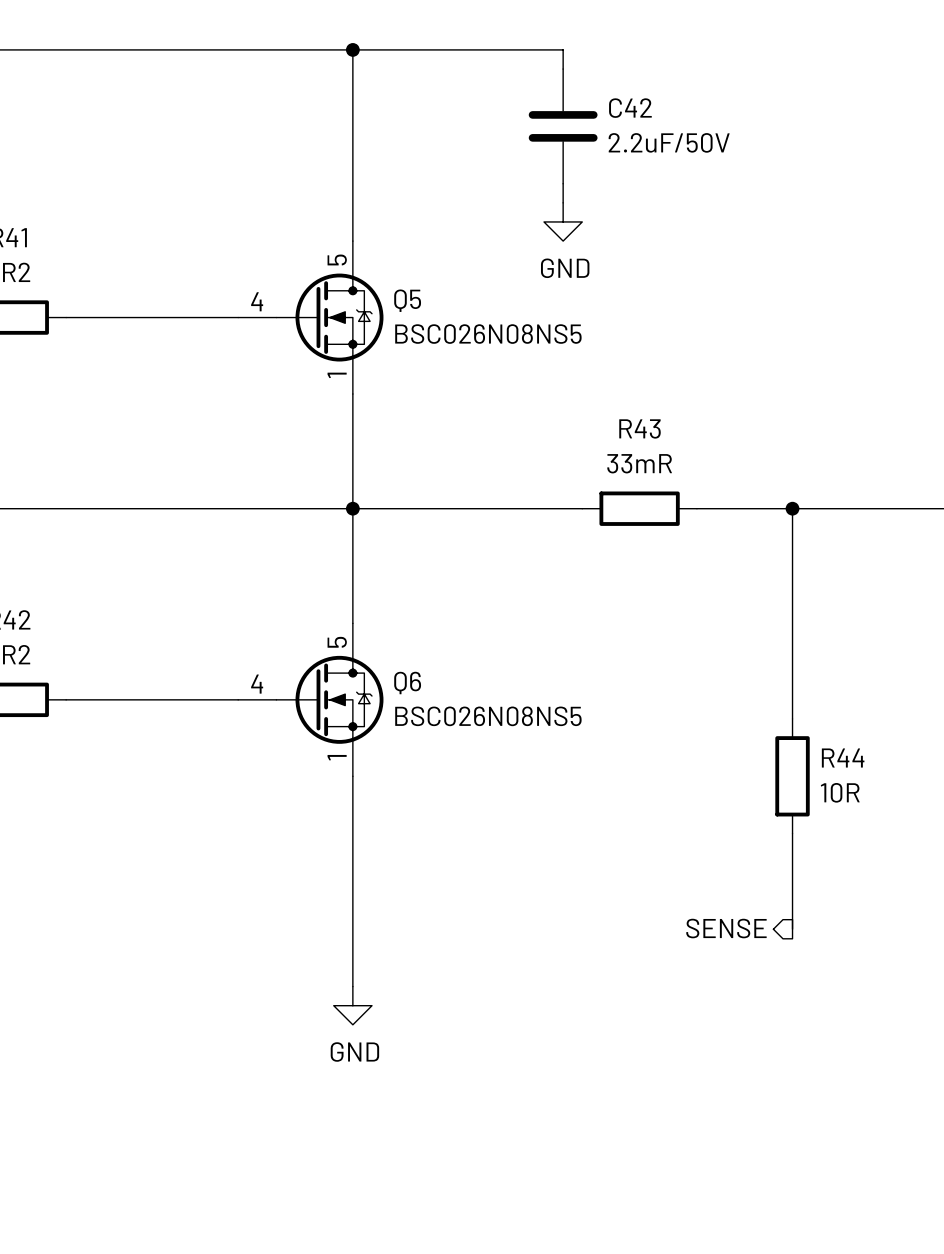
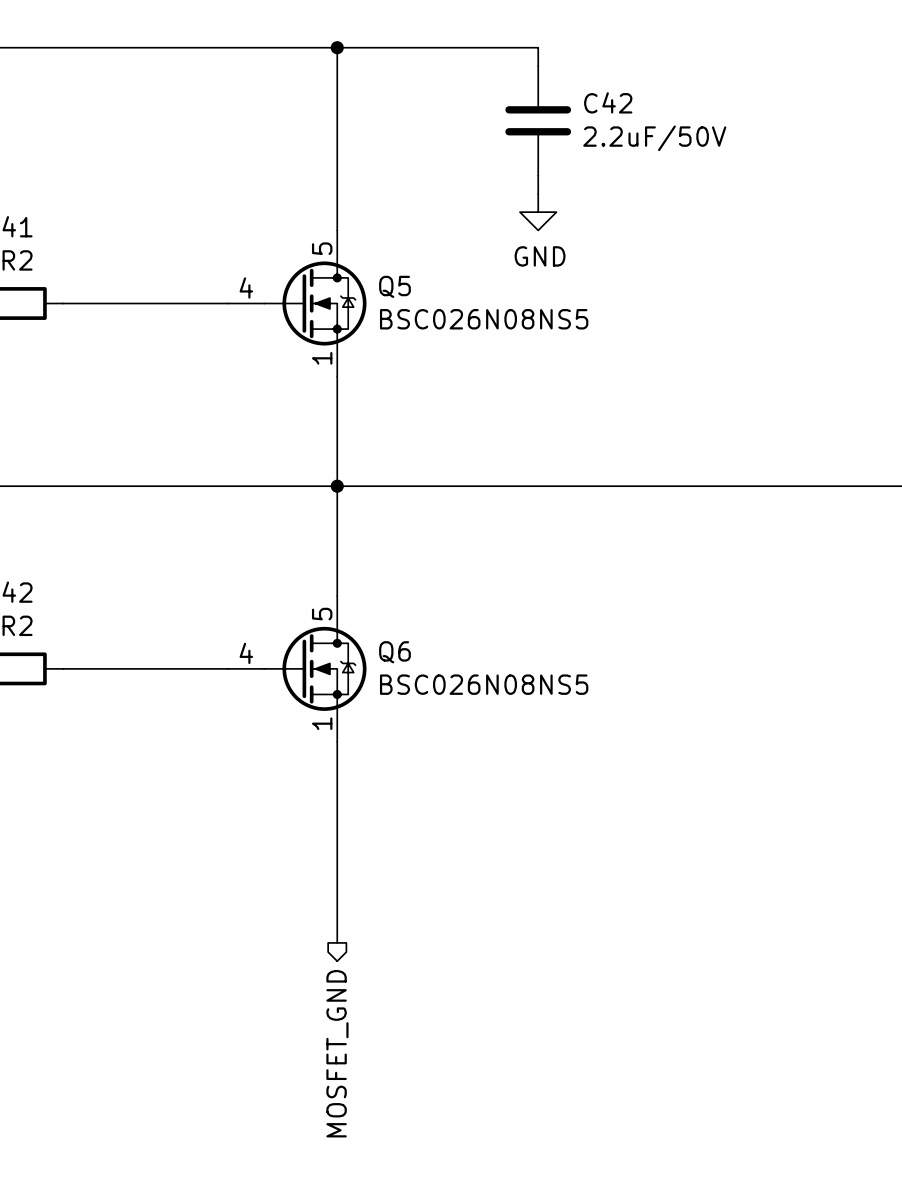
wire: none -> (556, 486) (666, 486)
R43: 33mR (639, 508) -> none
wire: (792, 508) (792, 718) -> none
junction: (792, 508) -> none
R44: 10R (792, 776) -> none
wire: (792, 833) (792, 929) -> none
hierarchical label: SENSE (726, 928) -> none
power symbol: GND (352, 1005) -> none
hierarchical label: none -> MOSFET_GND (337, 1053)

